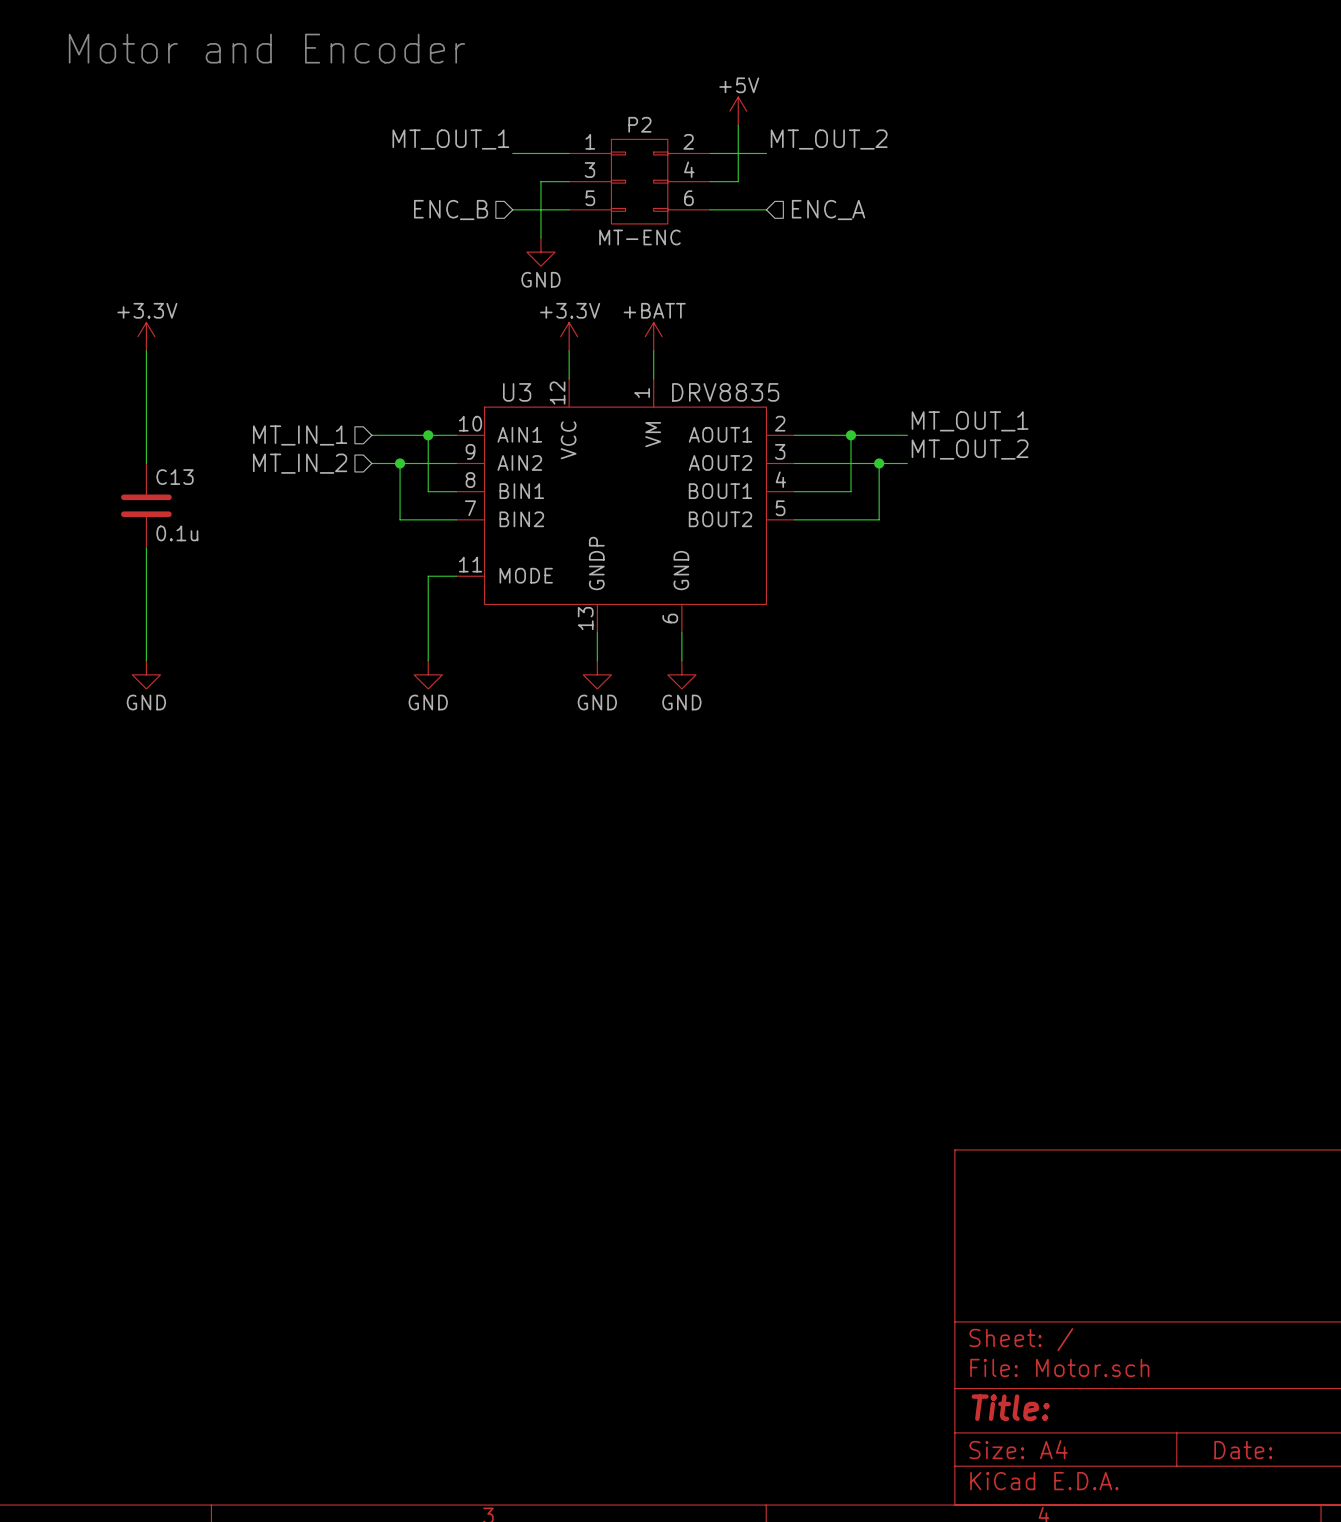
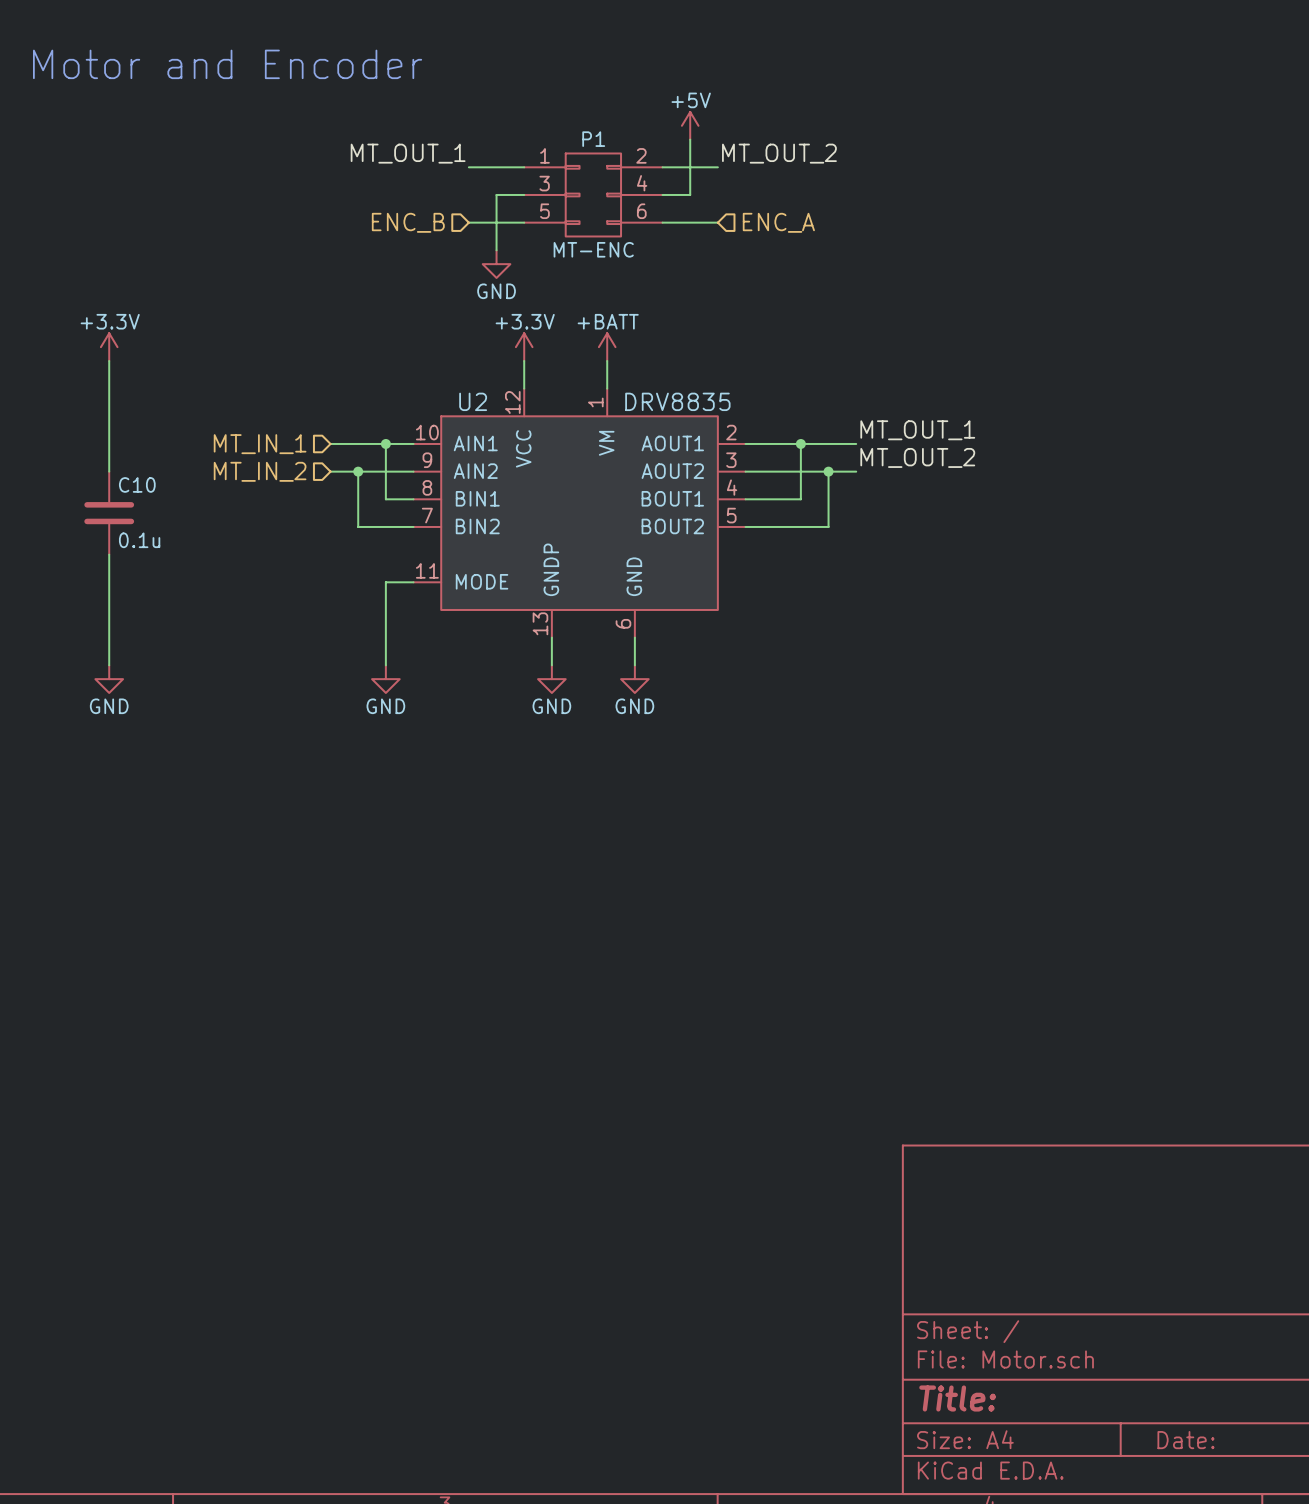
P2 name: P2 (639, 124) -> P1 (593, 139)
U3 name: U3 (517, 392) -> U2 (473, 401)
C13 name: C13 (175, 477) -> C10 (137, 484)

